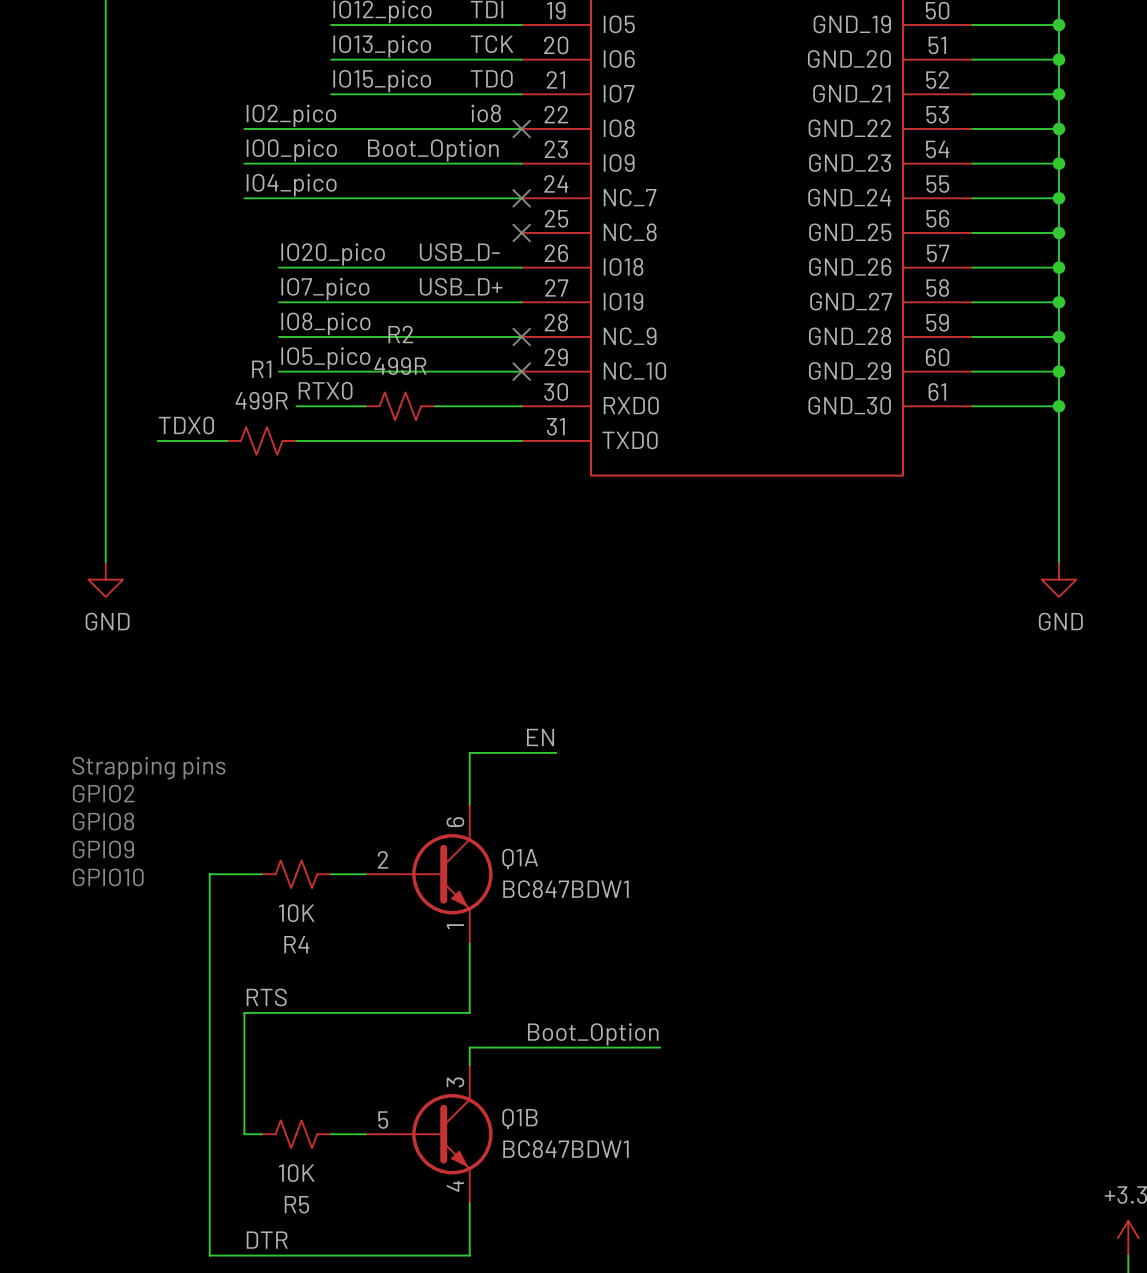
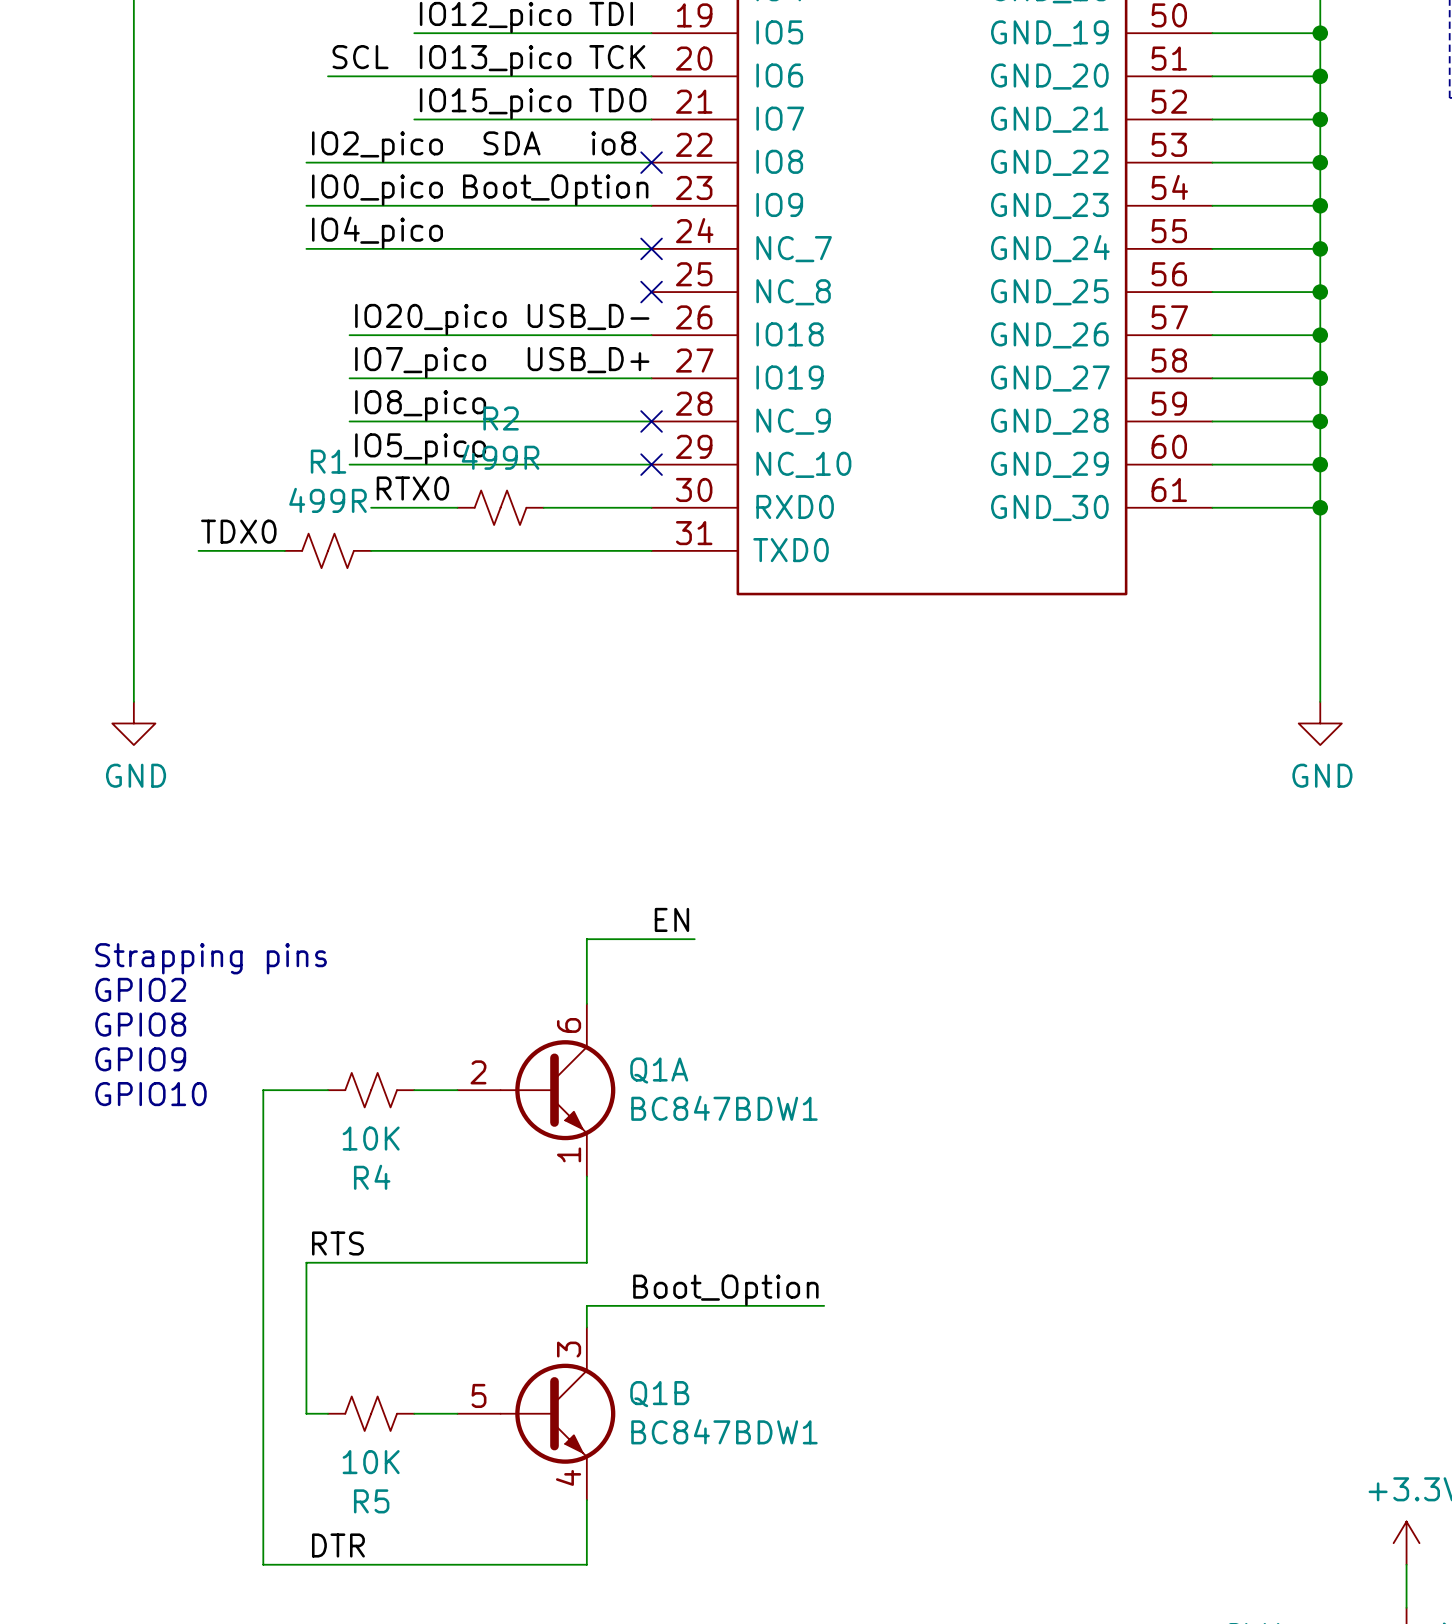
label: none -> SCL (360, 57)
wire: none -> (328, 76) (414, 76)
label: none -> SDA (512, 143)

